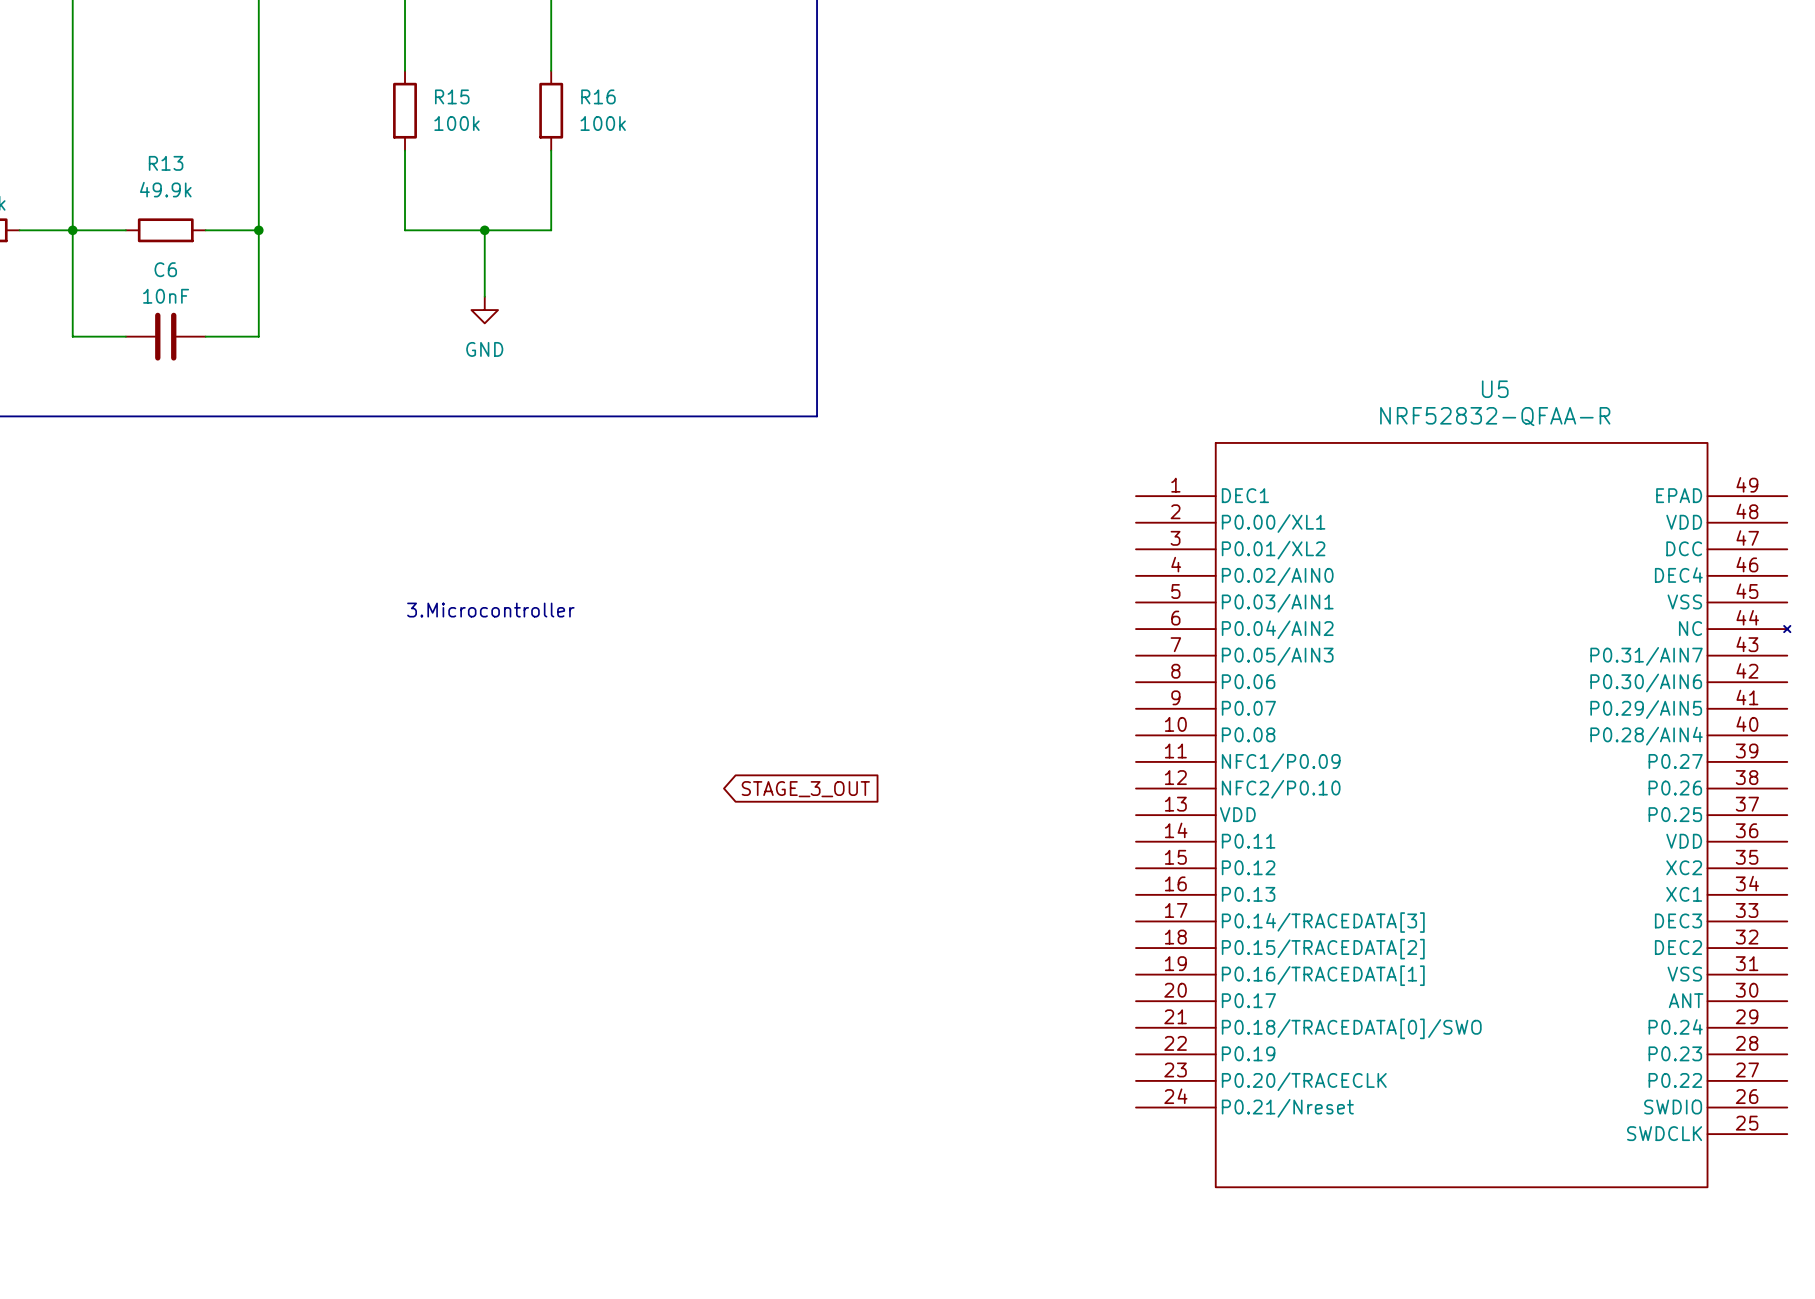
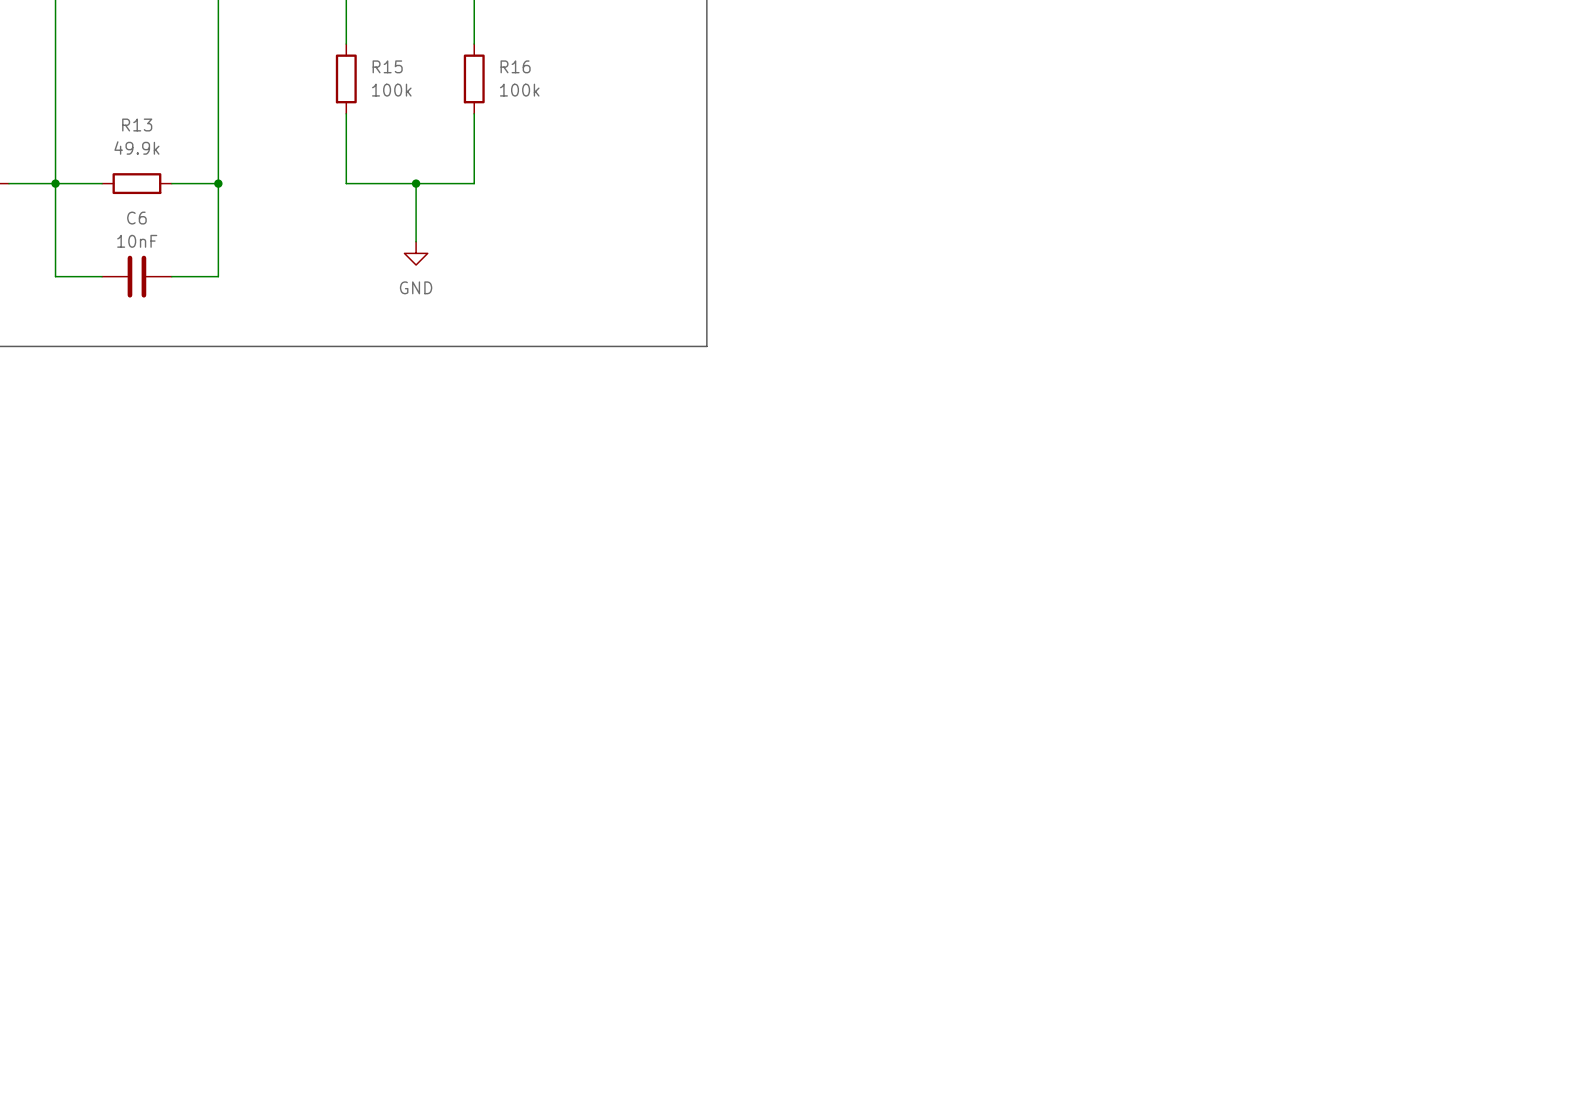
text: 3.Microcontroller (490, 610) -> none
global label: STAGE_3_OUT (805, 789) -> none
U5: NRF52832-QFAA-R (1463, 815) -> none

